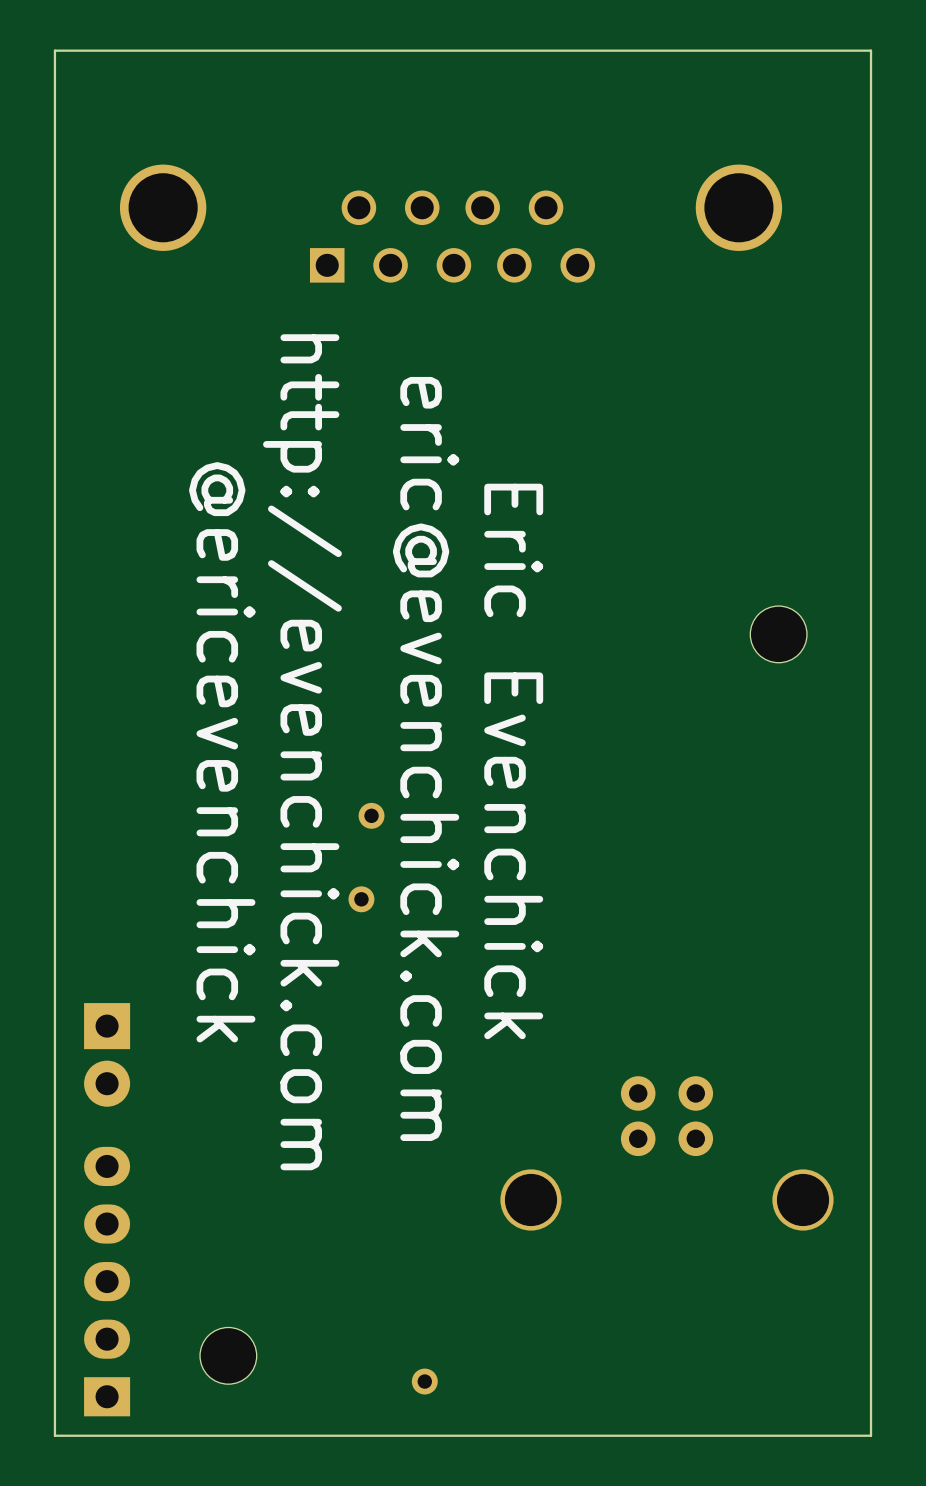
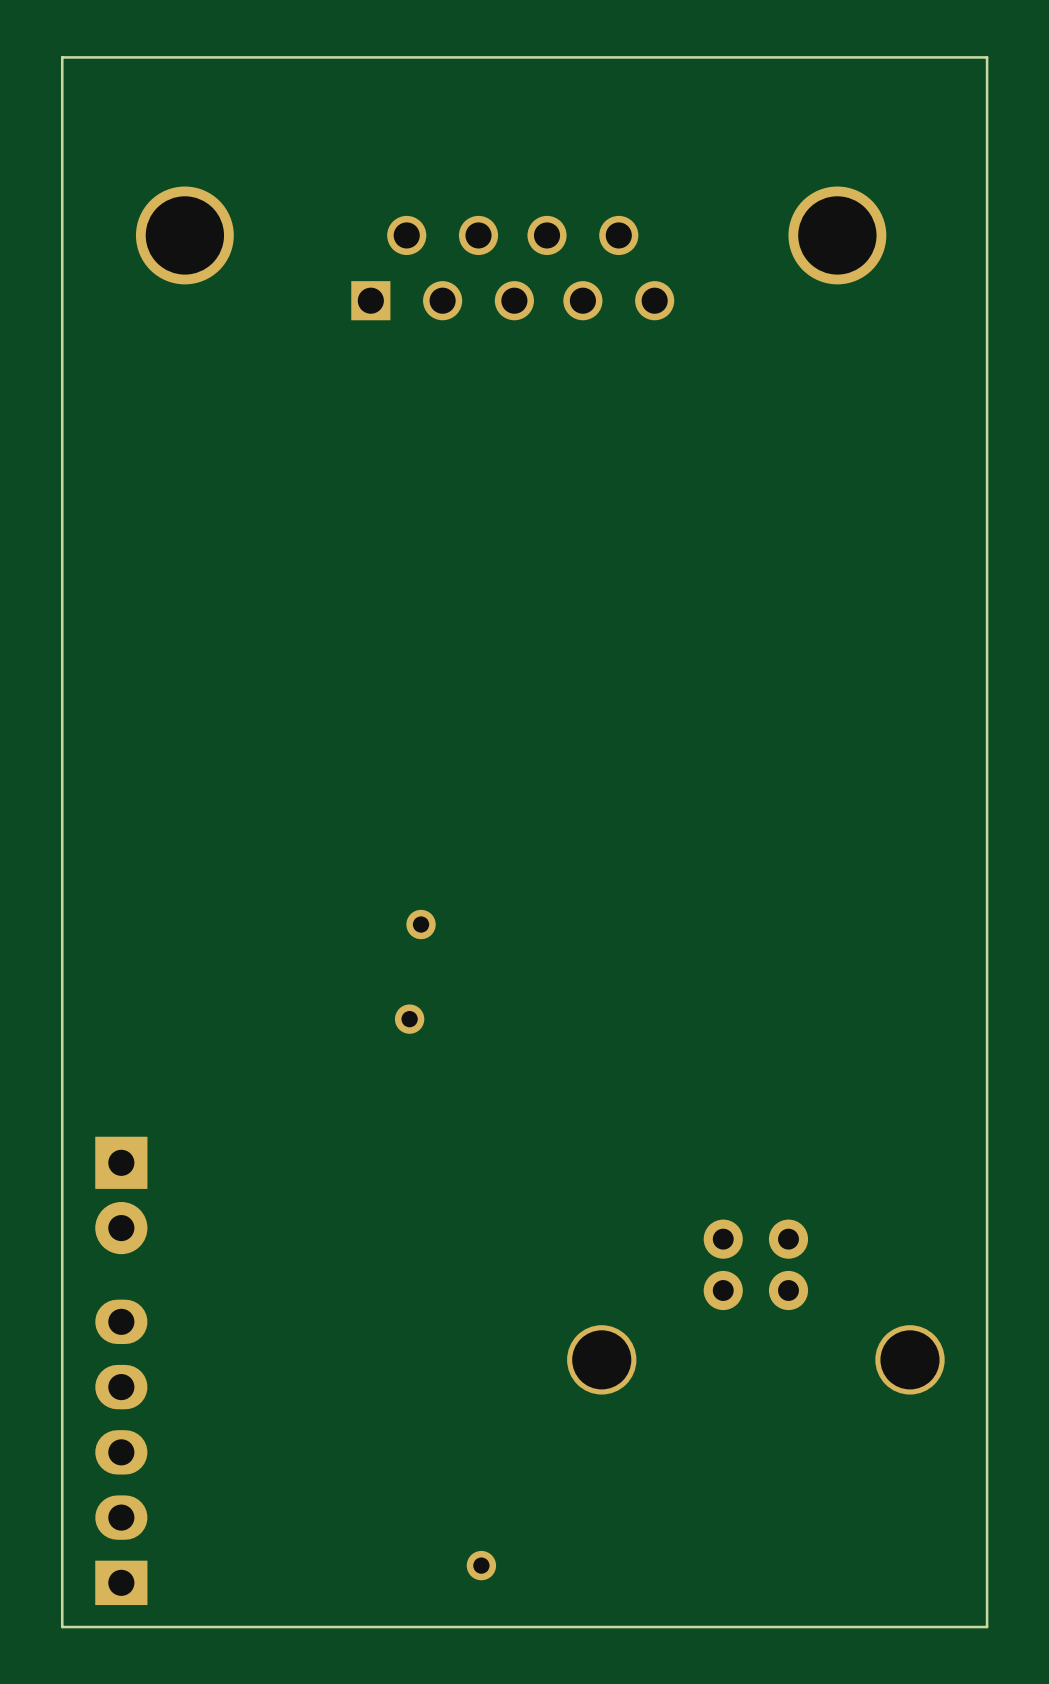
part: (778, 634) -> none
text: @ericevenchick (222, 752) -> none
text: http://evenchick.com (302, 752) -> none
text: eric@evenchick.com (426, 758) -> none
text: Eric Evenchick (513, 761) -> none
part: (228, 1355) -> none

